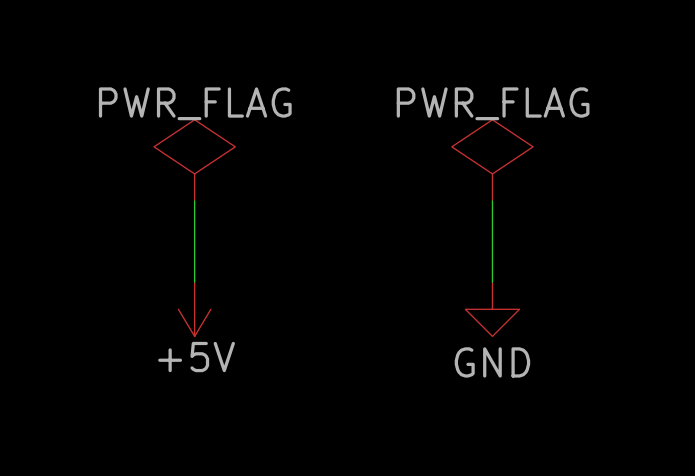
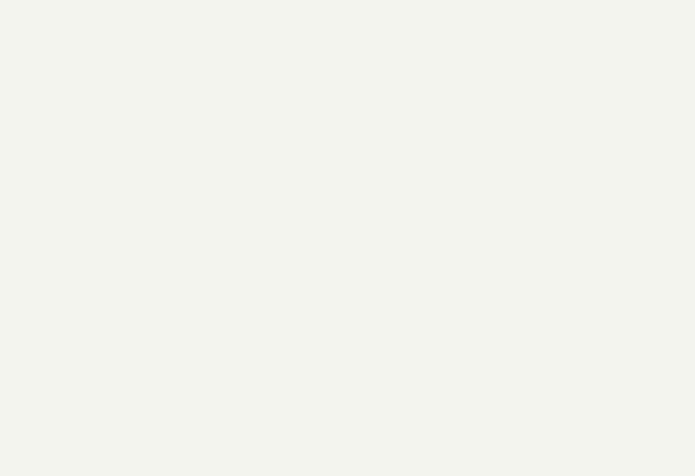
power symbol: PWR_FLAG (194, 160) -> none
power symbol: PWR_FLAG (492, 160) -> none
wire: (194, 200) (194, 282) -> none
wire: (492, 200) (492, 282) -> none
power symbol: +5V (194, 309) -> none
power symbol: GND (492, 309) -> none

